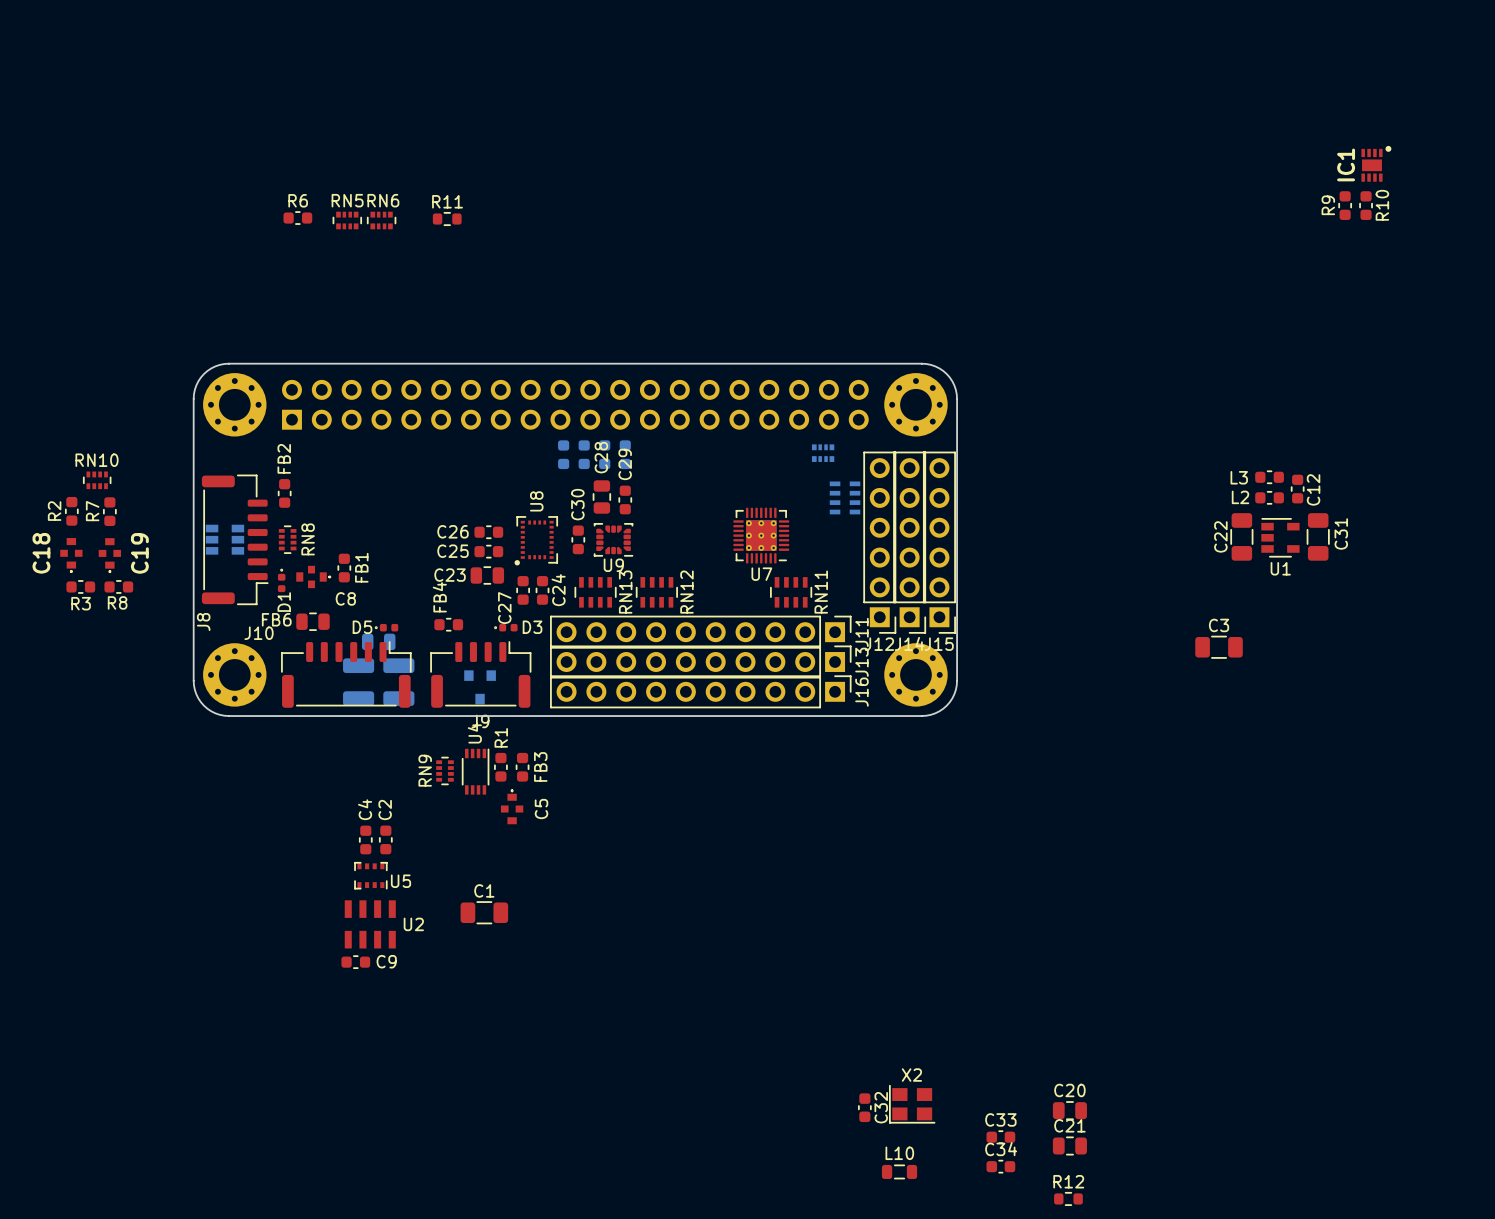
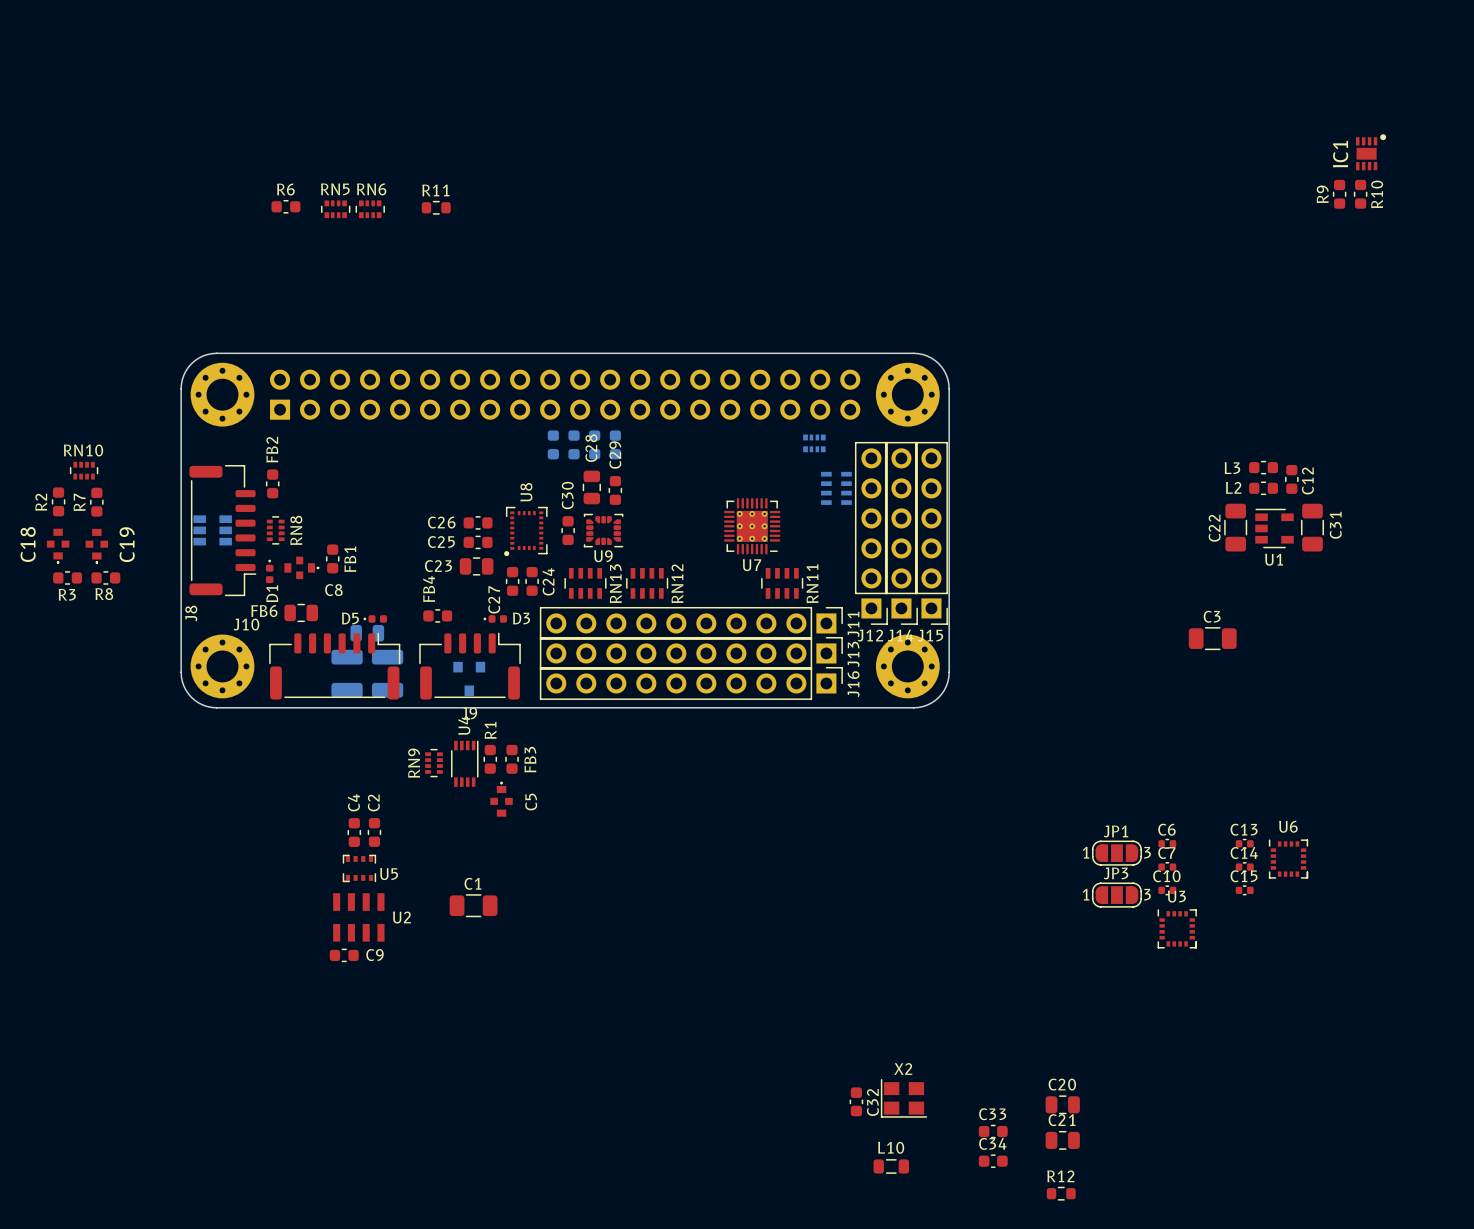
C6: none -> (1167, 843)
C13: none -> (1244, 843)
JP1: none -> (1116, 853)
U6: none -> (1288, 859)
C7: none -> (1167, 867)
C14: none -> (1244, 867)
C10: none -> (1167, 890)
C15: none -> (1244, 890)
JP3: none -> (1116, 895)
U3: none -> (1177, 928)

